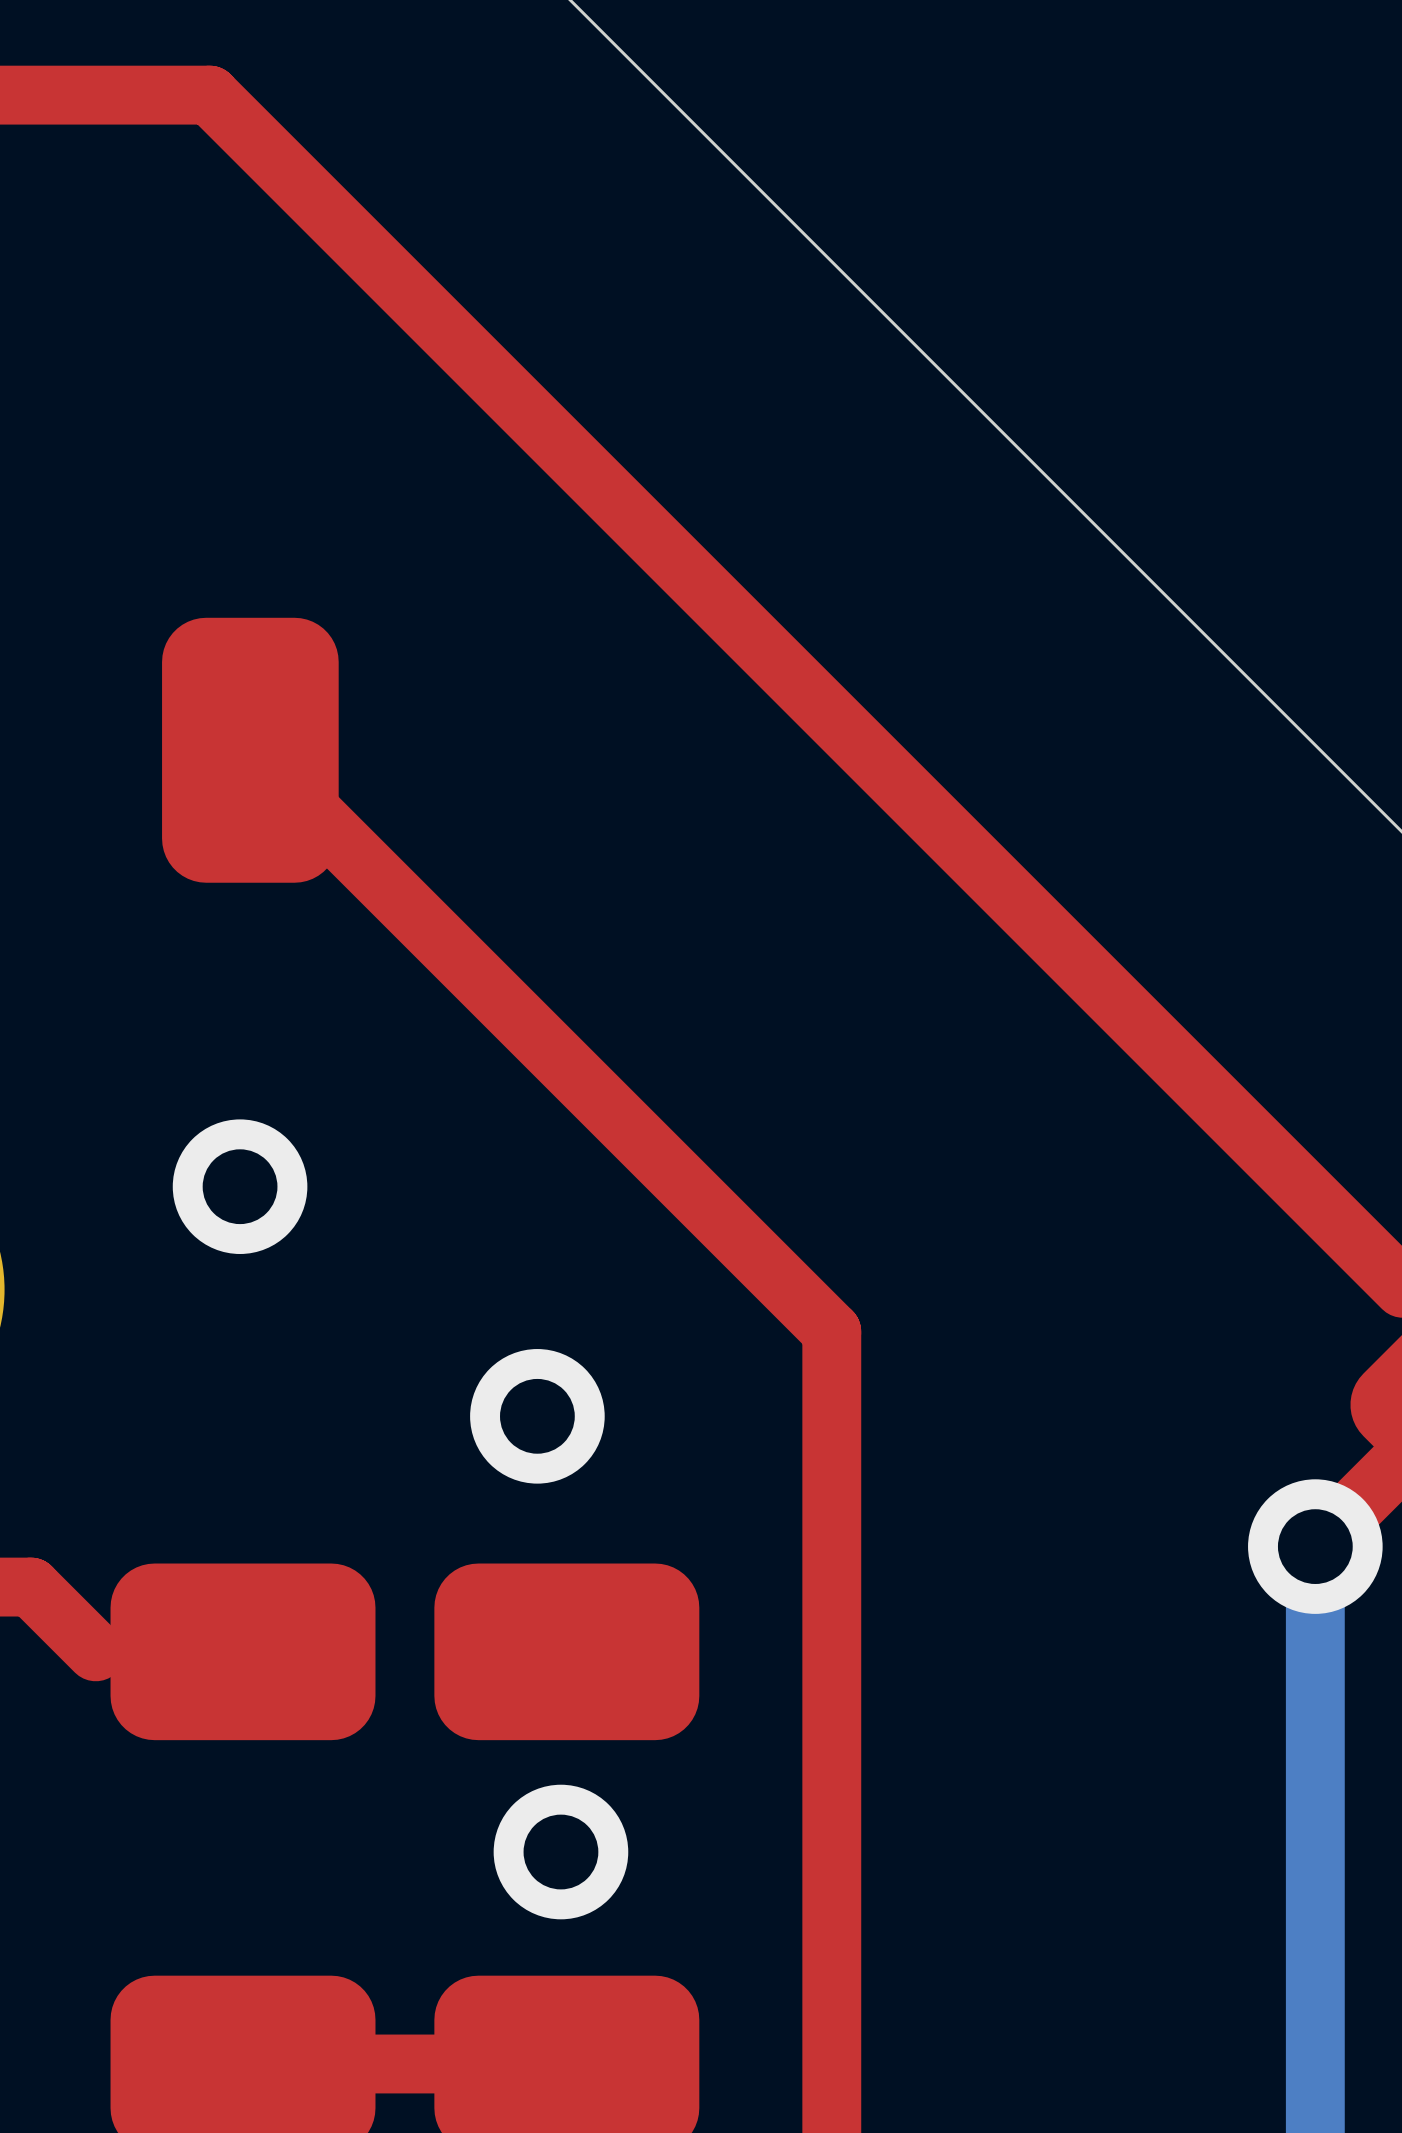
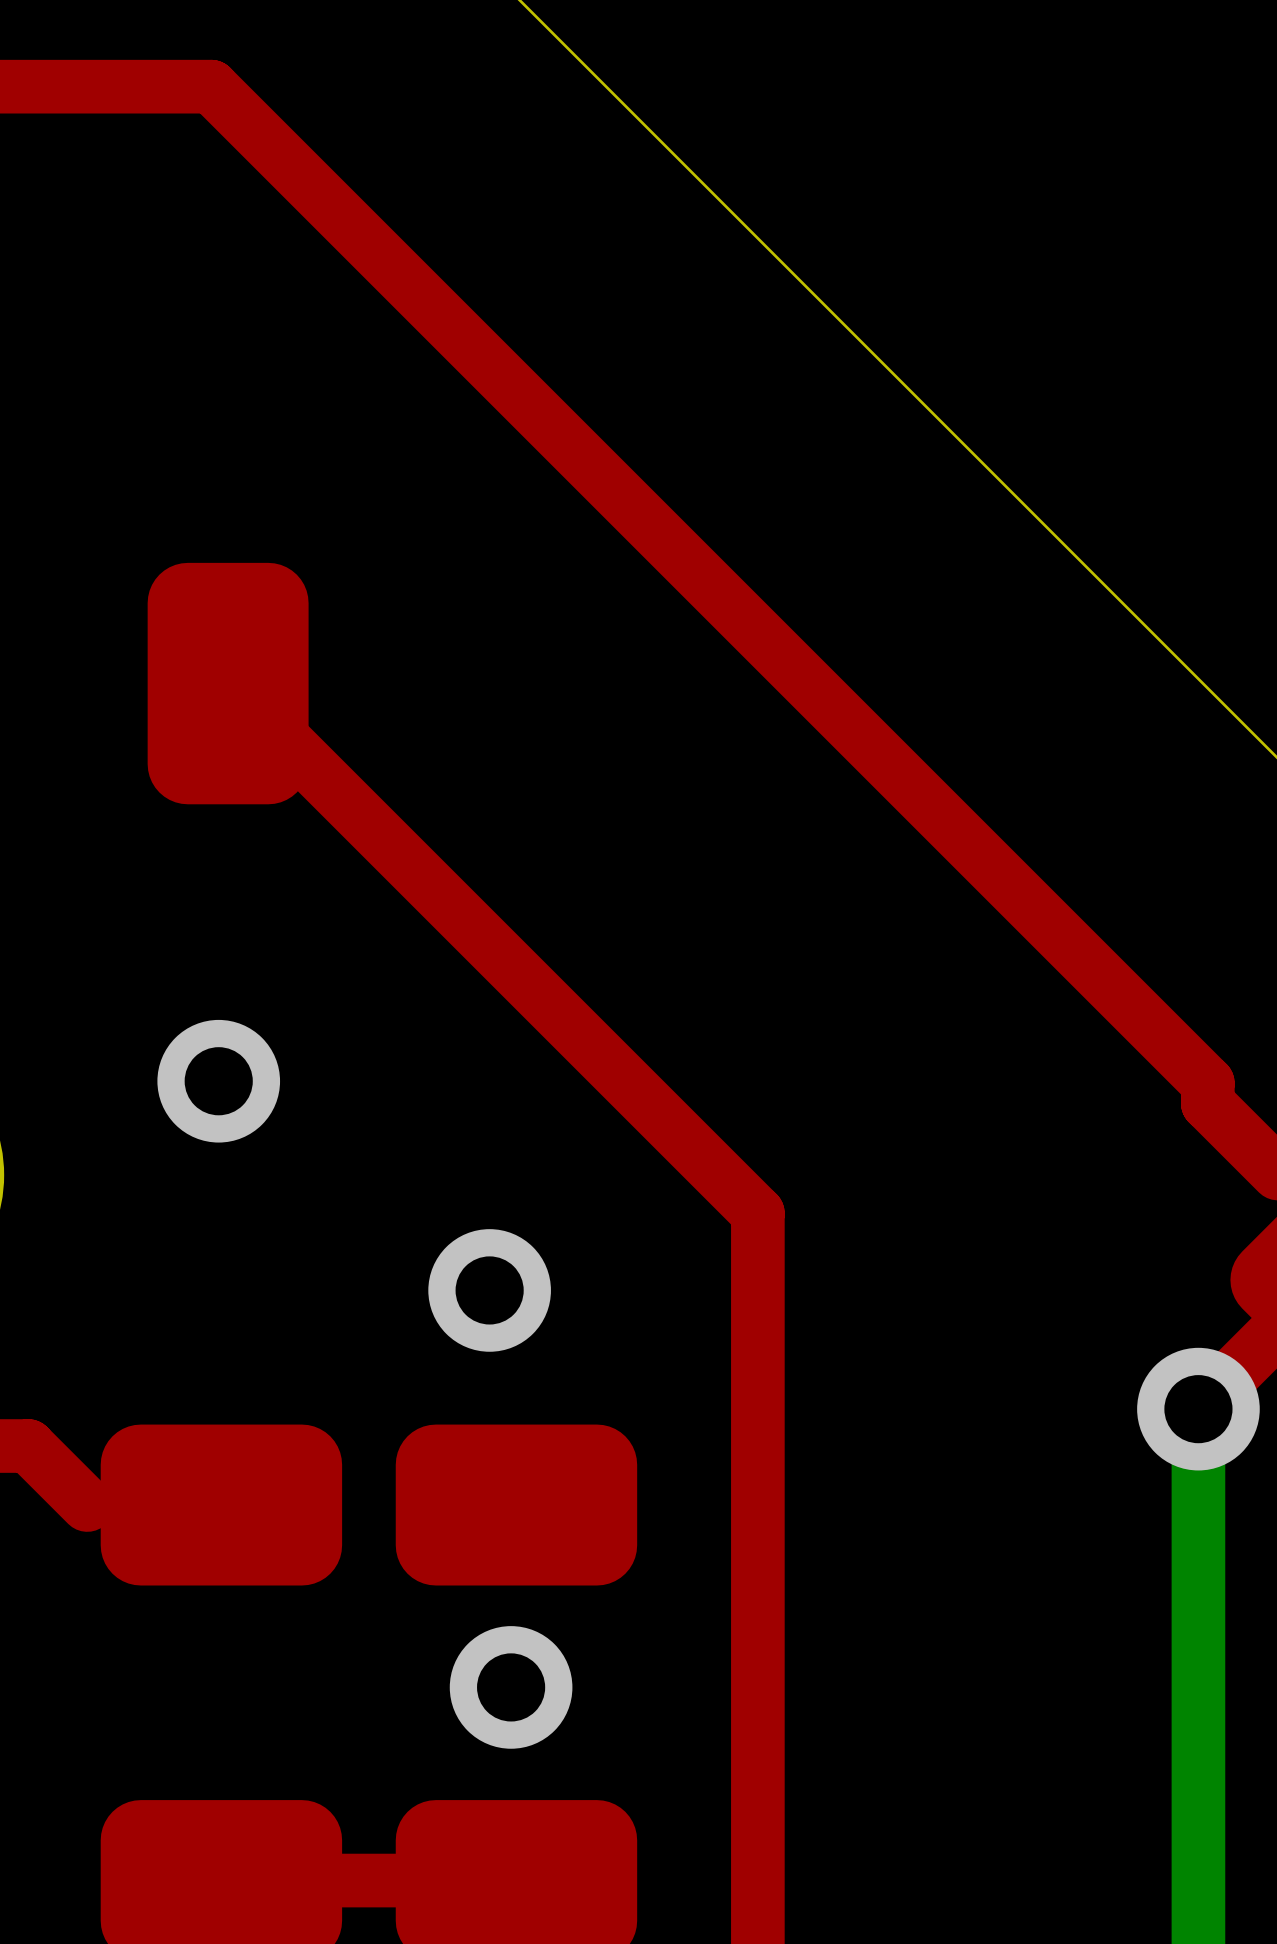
top track: (209, 95) (1325, 1210) -> (191, 86) (211, 86) (1207, 1083) (1207, 1103)

